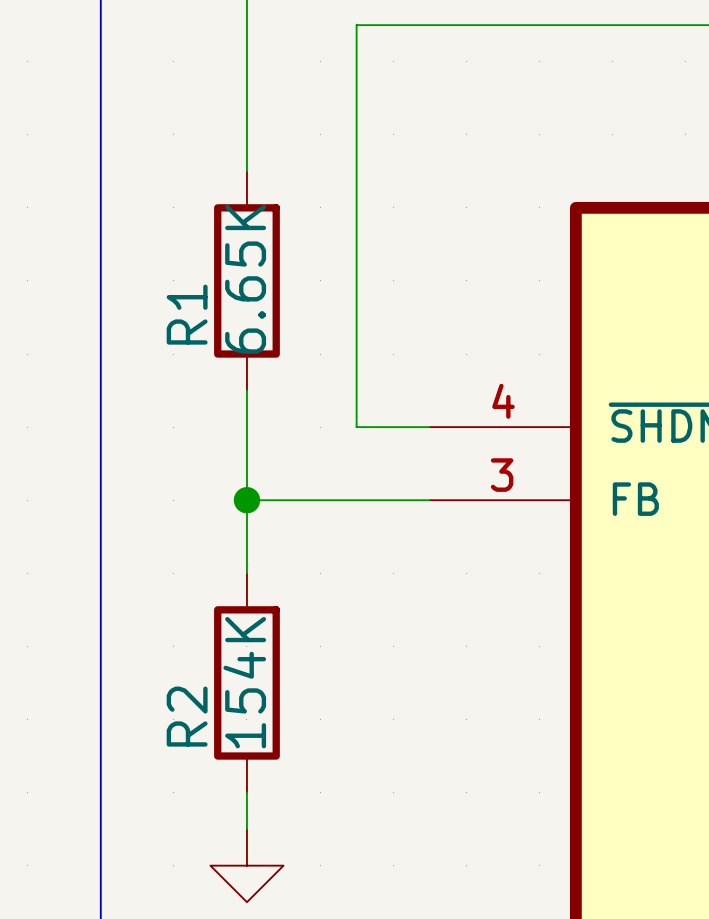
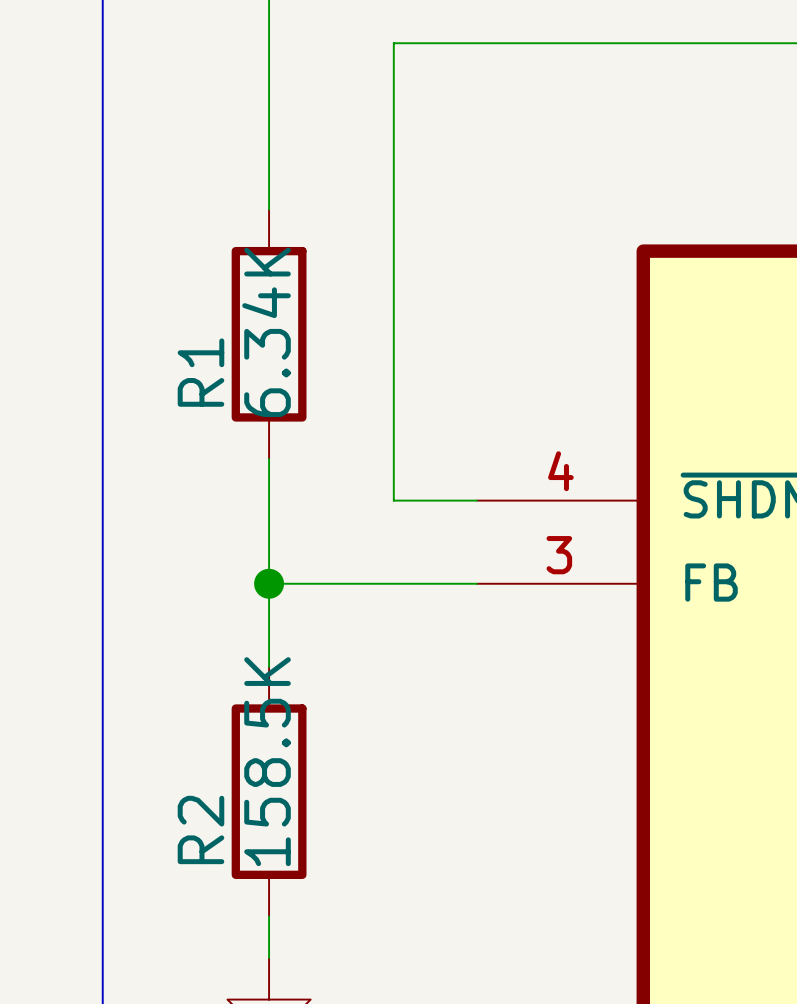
R1 value: 6.65K (245, 279) -> 6.34K (266, 332)
R2 value: 154K (244, 682) -> 158.5K (267, 761)

